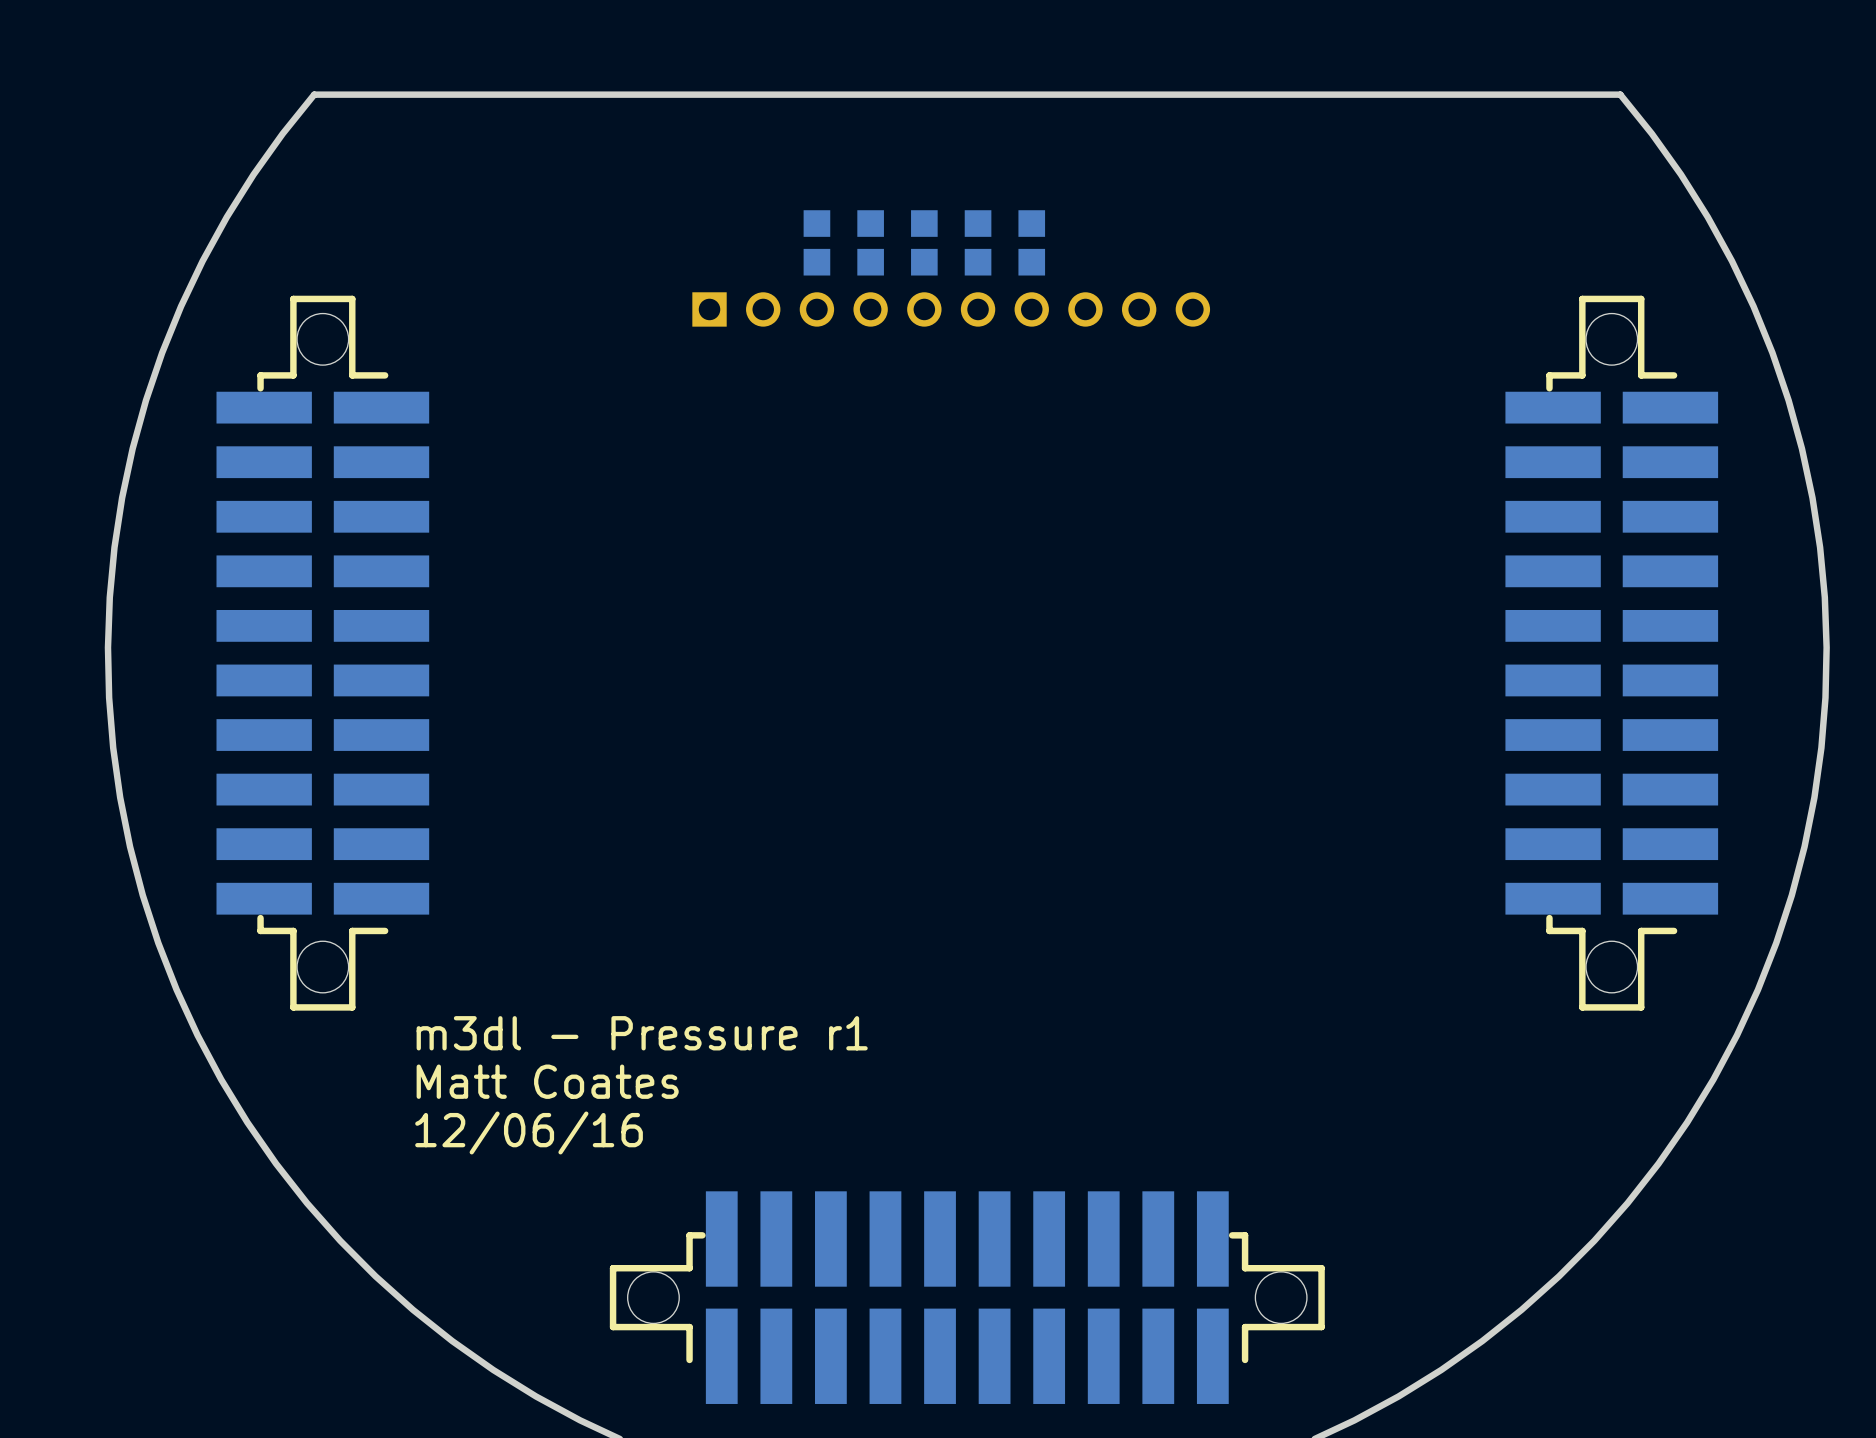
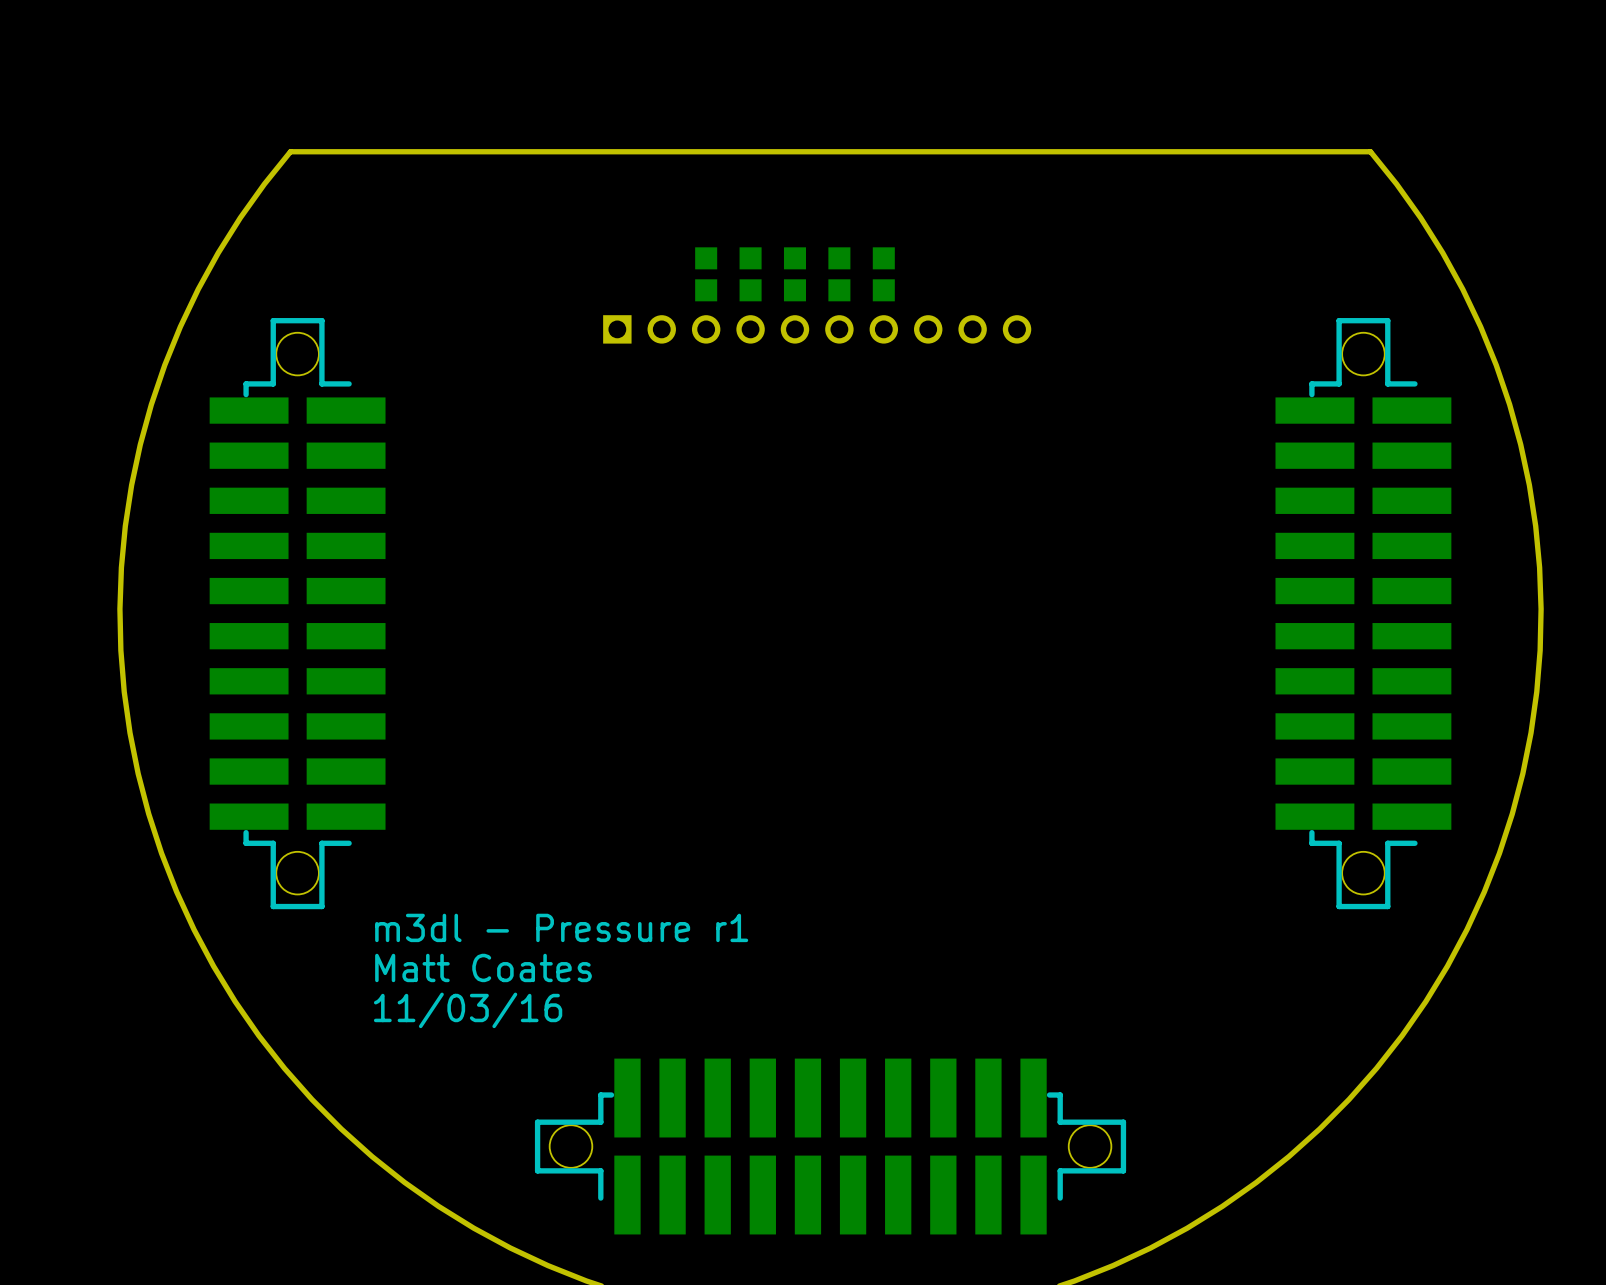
text: 12/06/16 (529, 1132) -> 11/03/16 (468, 1010)

